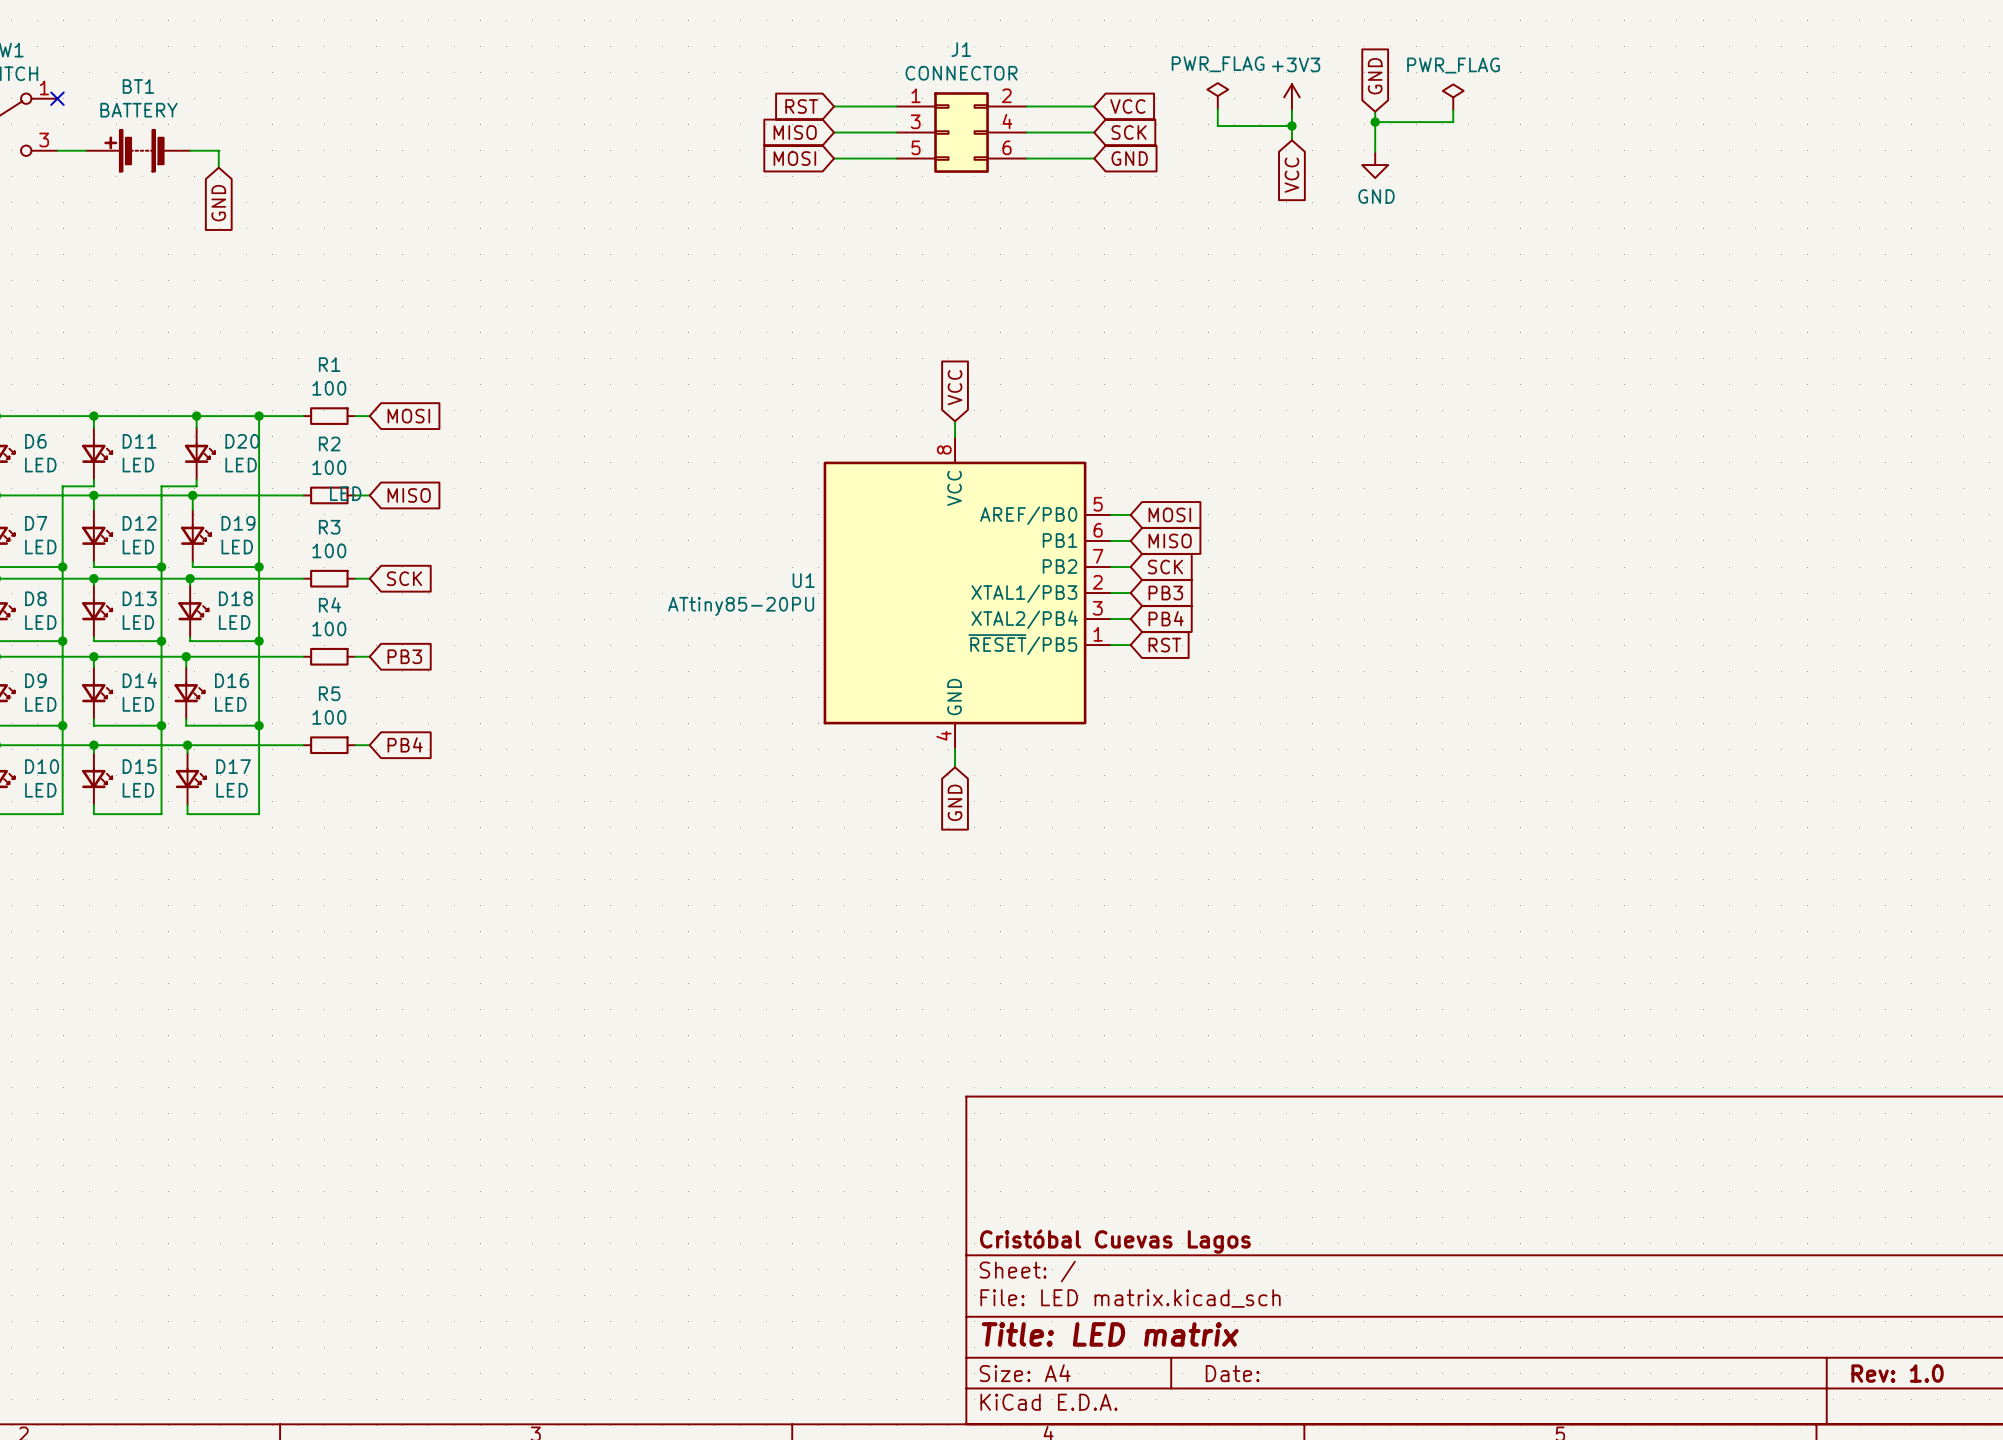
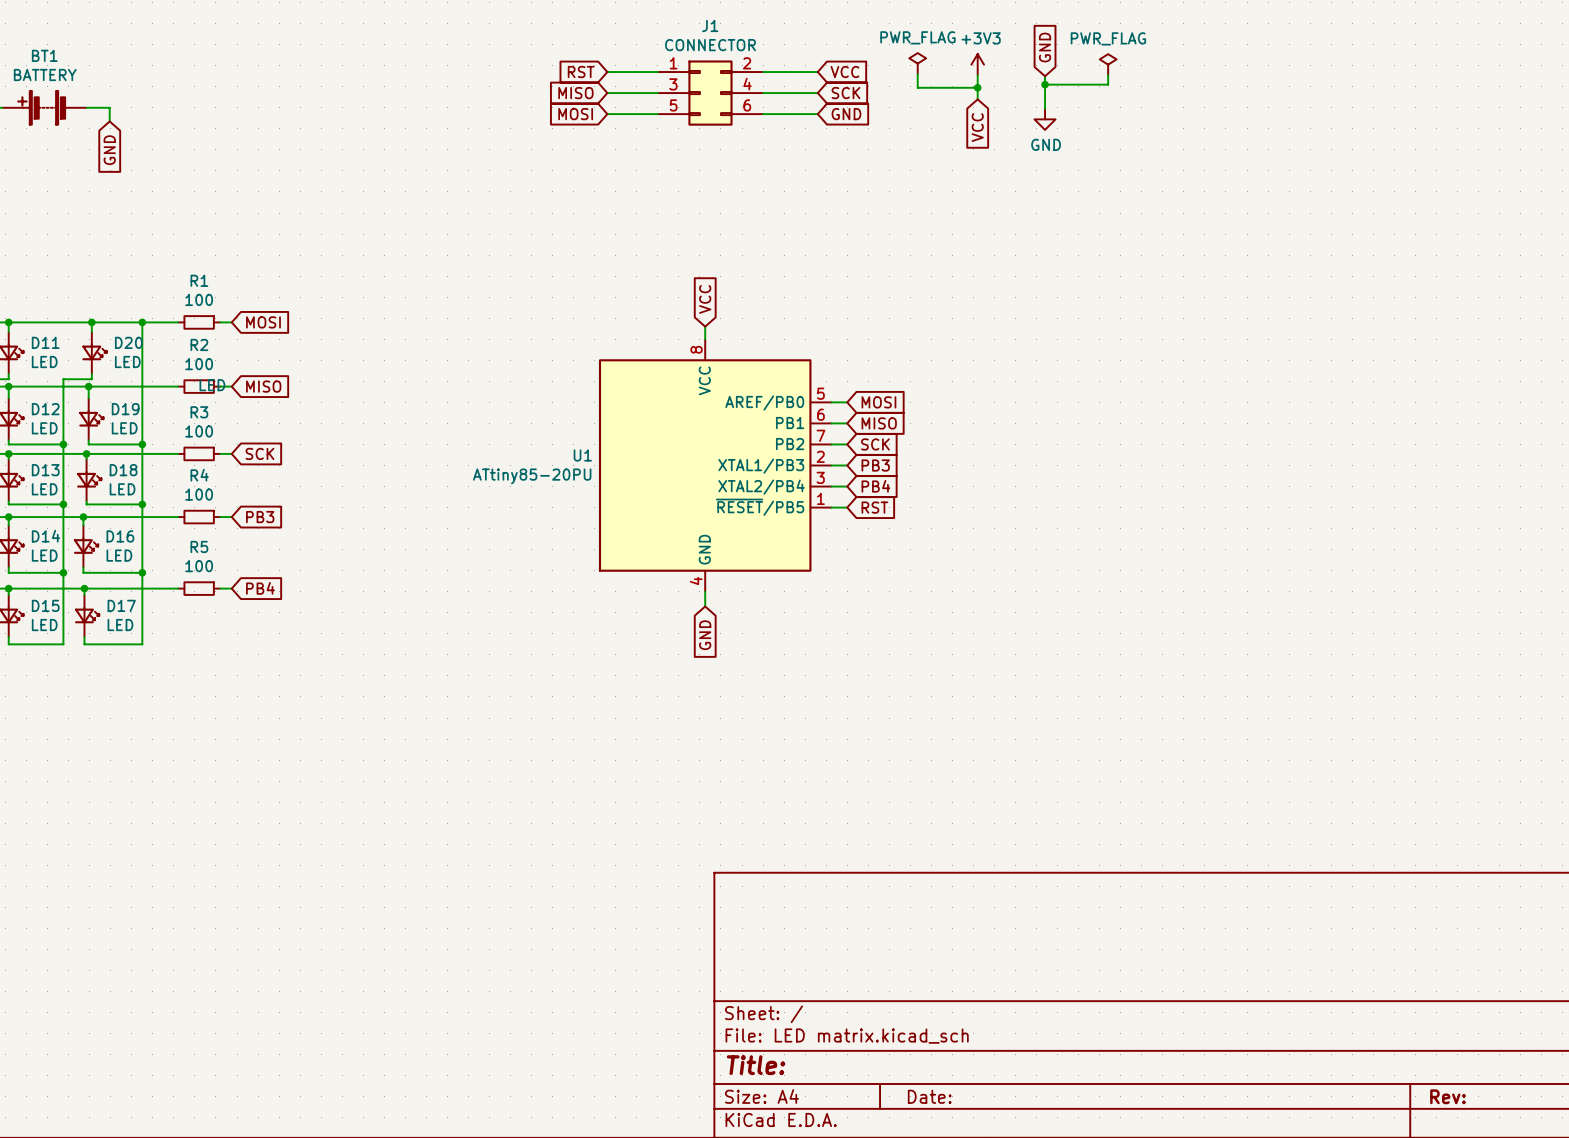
title block: Cristóbal Cuevas Lagos (1115, 1241) -> none
title block: Title: LED matrix (1110, 1334) -> Title: (756, 1065)
title block: Rev: 1.0 (1897, 1373) -> Rev: (1447, 1096)

